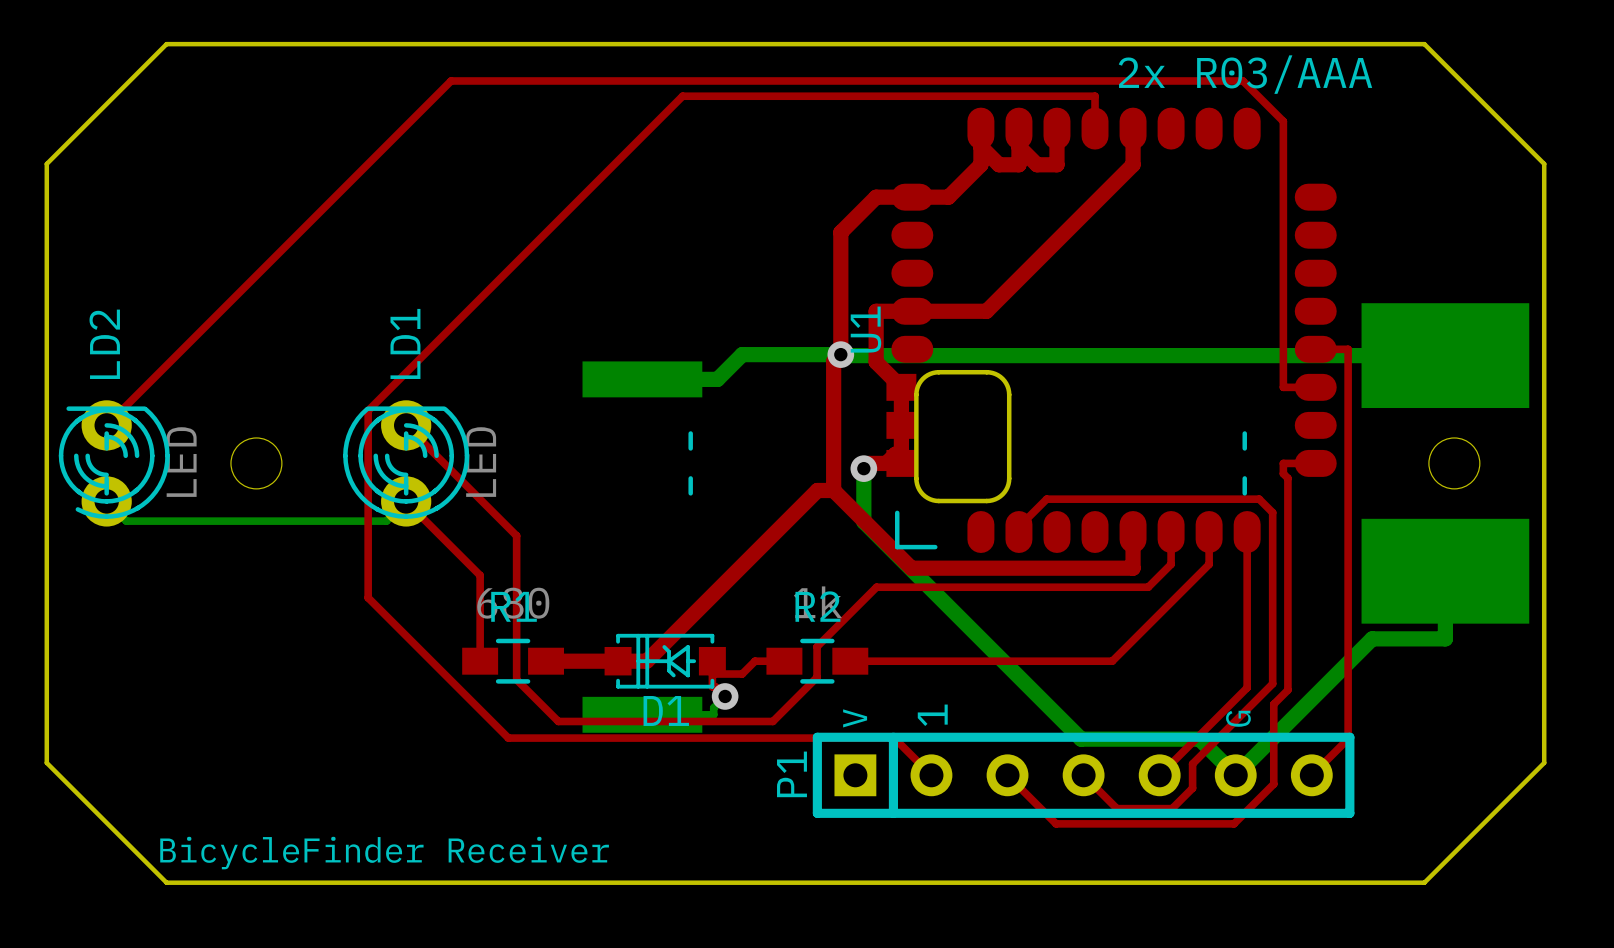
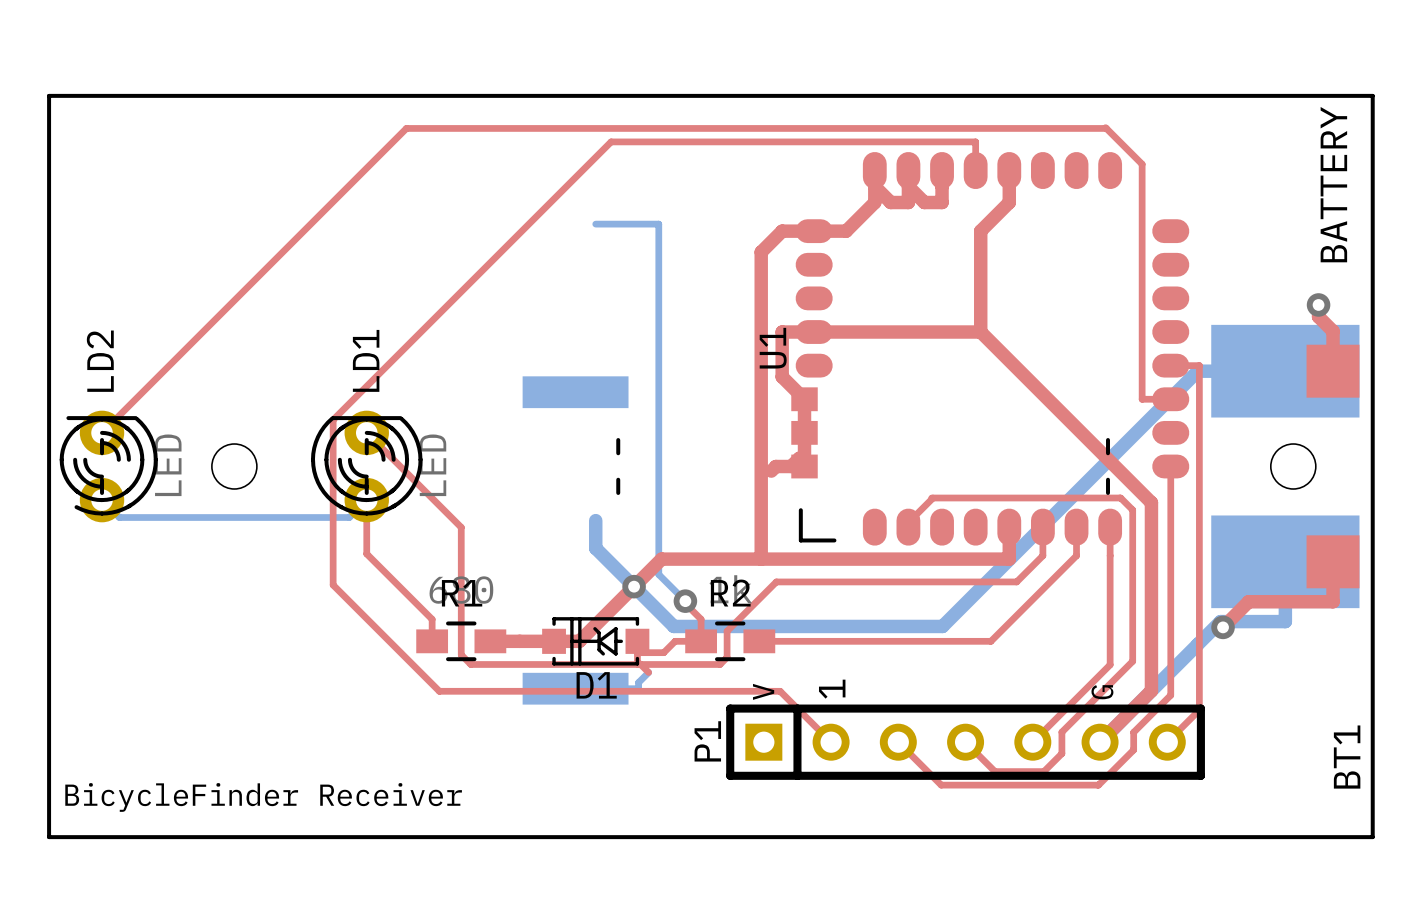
U1 footprint: [886, 107, 1337, 553] -> [791, 152, 1190, 546]
bottom track: none -> (595, 224) (658, 224) (658, 574) (685, 601)
top track: (1100, 197) (986, 311) -> (980, 231) (980, 332)
top track: (852, 220) (840, 232) (840, 354) (833, 361) (833, 490) -> (761, 252) (761, 559)
top track: none -> (1318, 304) (1318, 316) (1333, 331) (1333, 371)
via: none -> (1318, 304)
top track: none -> (879, 332) (980, 332)
top track: none -> (980, 332) (1151, 502) (1151, 690) (1100, 742)
via: (840, 354) -> none
bottom track: (1346, 355) (742, 354) (717, 379) (642, 379) -> (1197, 371) (942, 626) (673, 626) (595, 548) (595, 520)
part: 2x R03/AAA (795, 463) -> none
BT1: none -> BATTERY (710, 466)
top track: (1315, 463) (1283, 463) (1283, 473) (1287, 478) (1287, 690) (1273, 704) (1273, 764) -> (1170, 466) (1170, 695) (1133, 732)
bottom track: (863, 468) (863, 521) (1081, 739) (1199, 739) (1235, 775) -> none
via: (863, 468) -> none
top track: (833, 490) (817, 490) (739, 568) -> (813, 559) (661, 559)
top track: (833, 490) (911, 568) -> none
top track: (406, 501) (480, 575) (480, 636) -> (366, 500) (366, 553) (432, 619)
top track: (513, 532) (516, 535) (516, 679) (558, 721) (772, 721) (817, 677) (817, 646) (876, 587) (1148, 587) -> (461, 527) (461, 654) (470, 664) (720, 664) (727, 657) (727, 631) (776, 581) (1016, 581) (1022, 575)
top track: none -> (1333, 561) (1333, 601) (1248, 601) (1223, 627)
top track: (368, 597) (508, 738) (894, 738) -> (333, 585) (439, 691) (780, 691) (798, 709)
via: none -> (634, 586)
top track: none -> (685, 601) (685, 603) (701, 619) (701, 641)
via: none -> (685, 601)
via: none -> (1223, 627)
via: (725, 696) -> none
text position: BicycleFinder Receiver (384, 853) -> BicycleFinder Receiver (263, 797)

